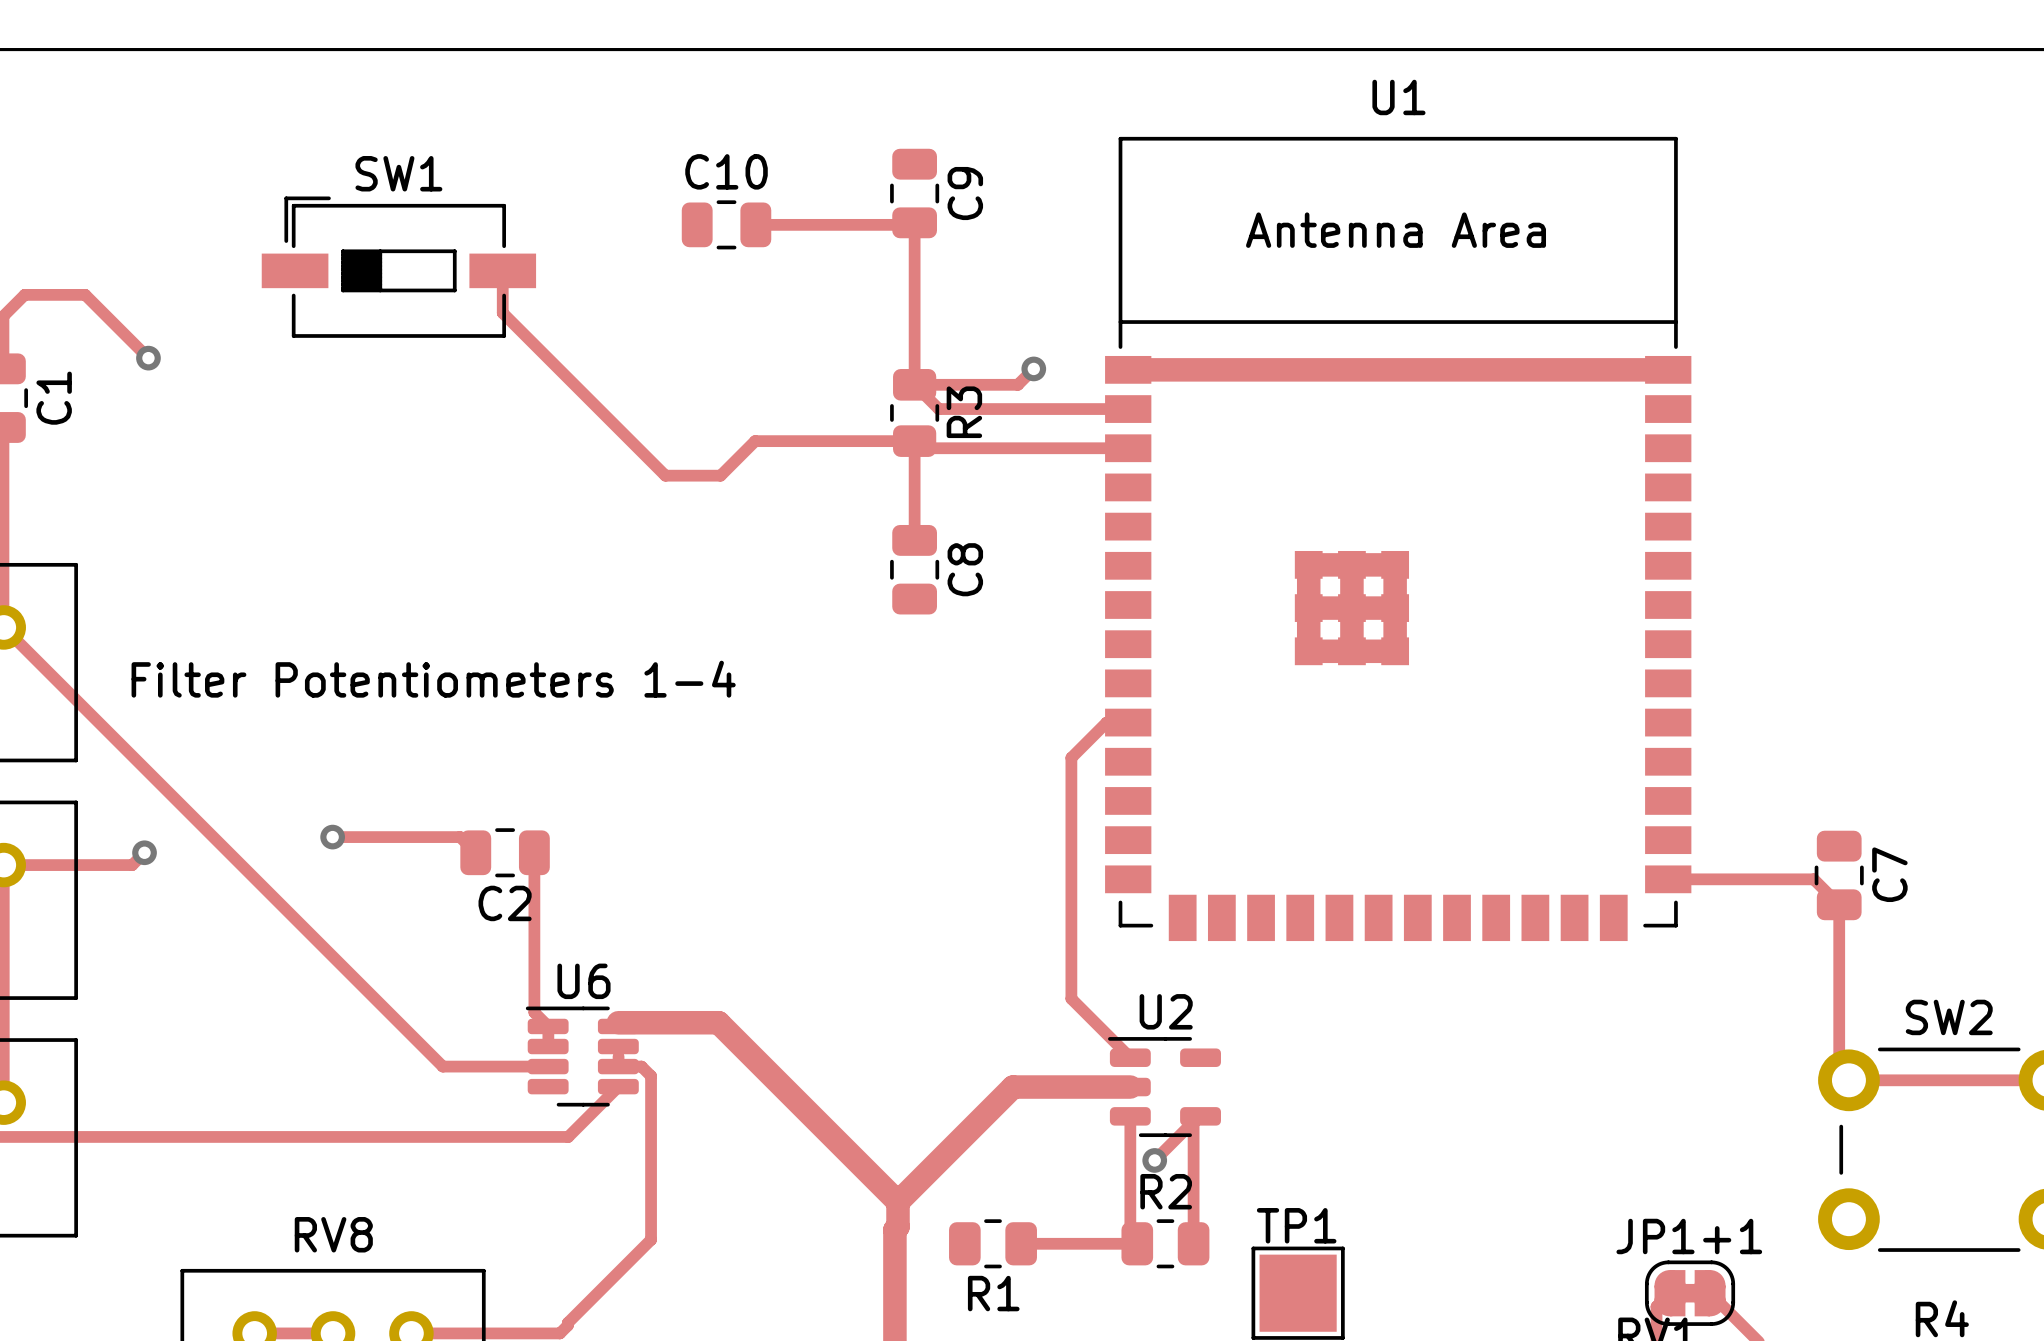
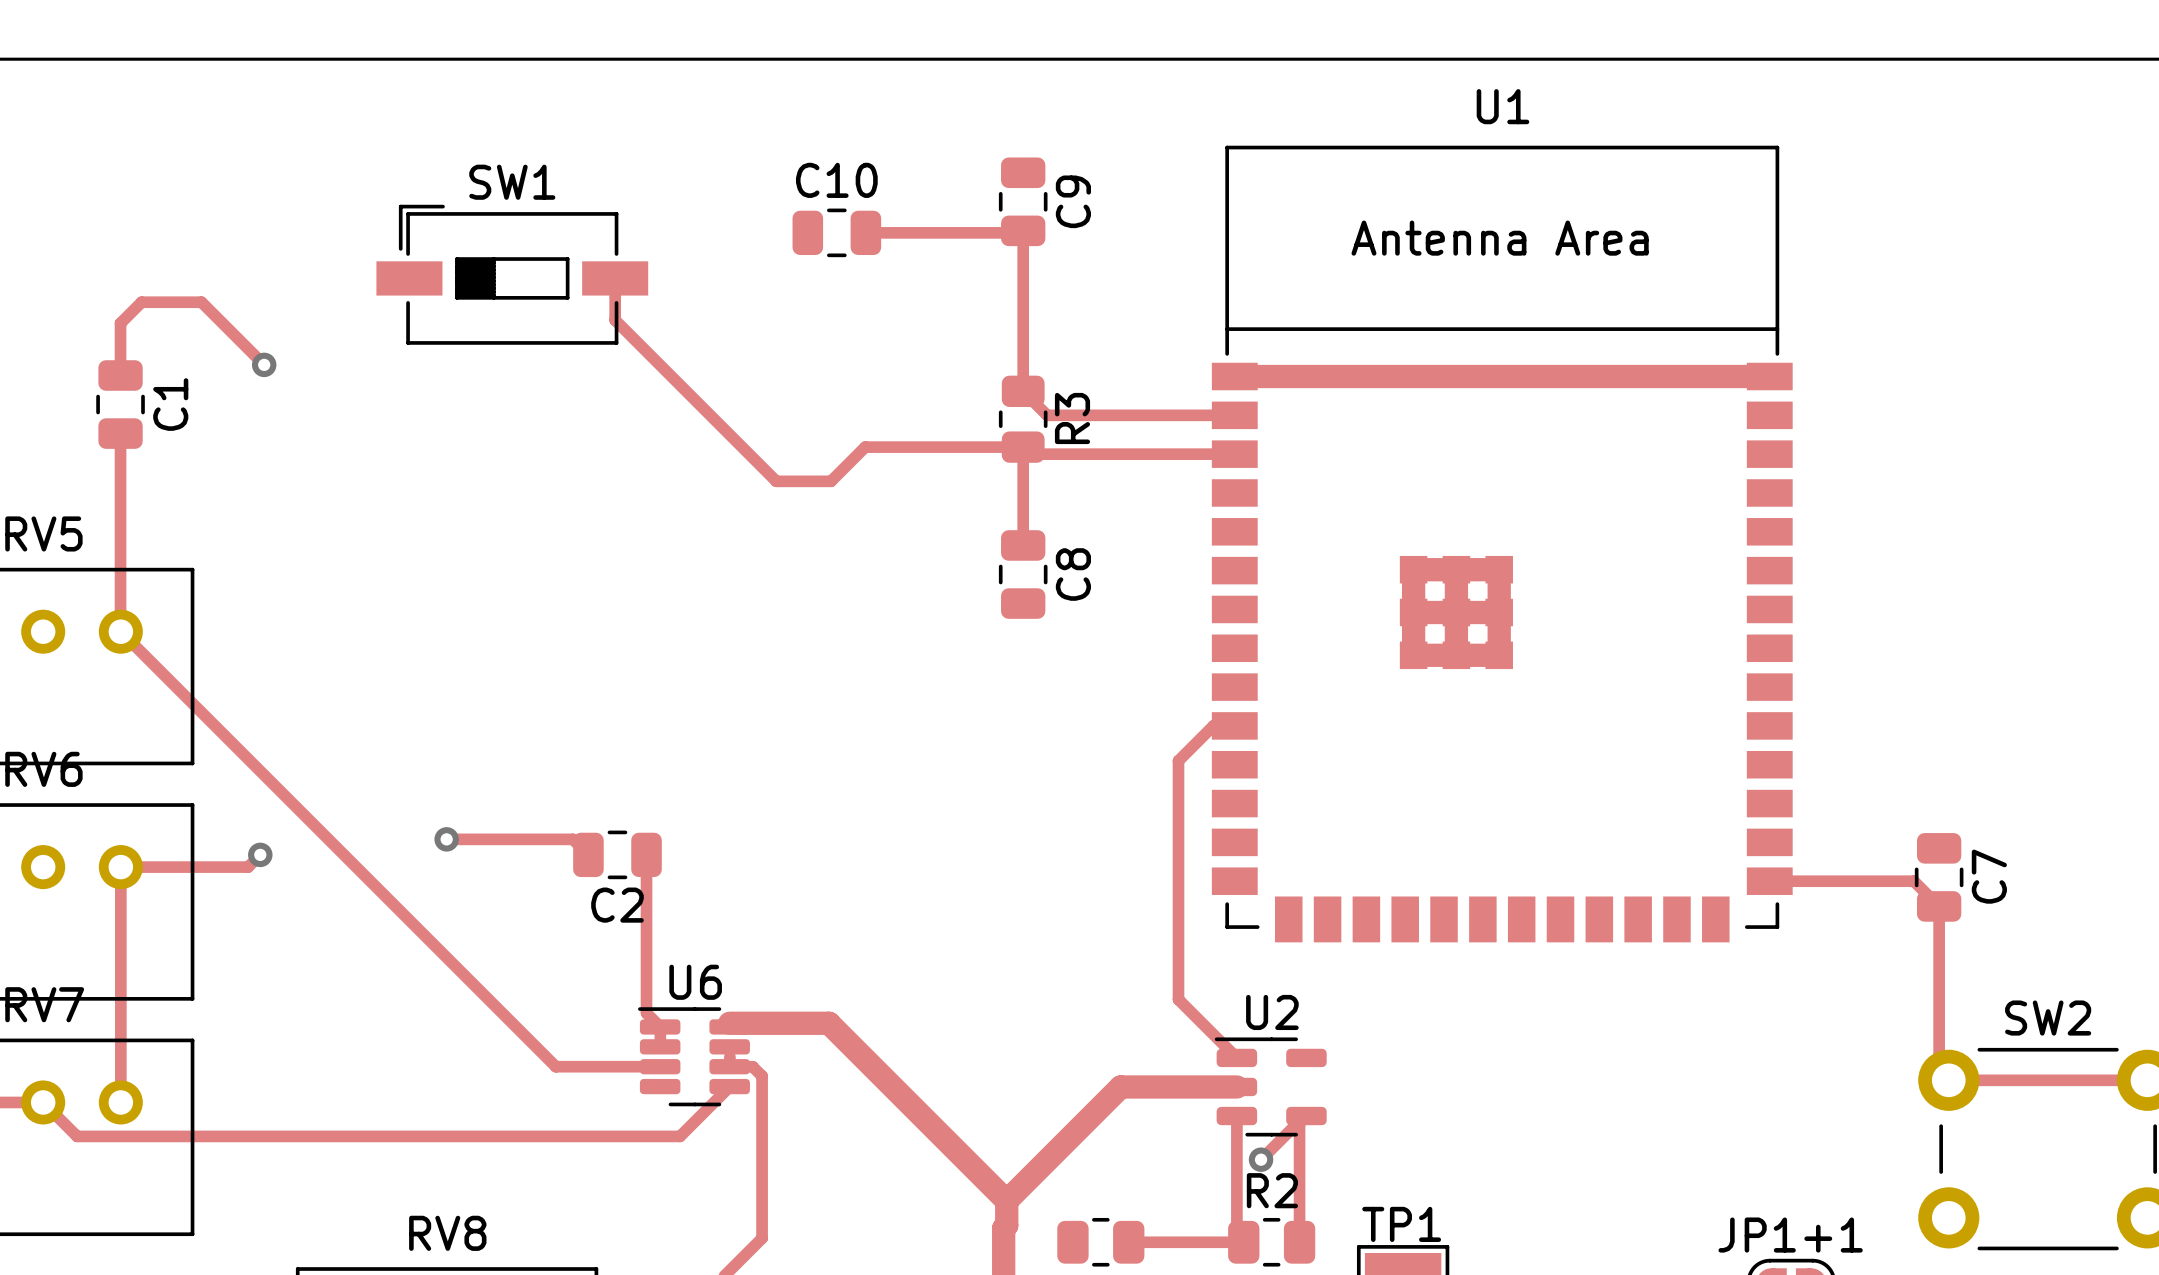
track: (1033, 368) (1017, 384) (914, 384) -> none
via: (1033, 368) -> none
text: Filter Potentiometers 1-4 (433, 679) -> none

